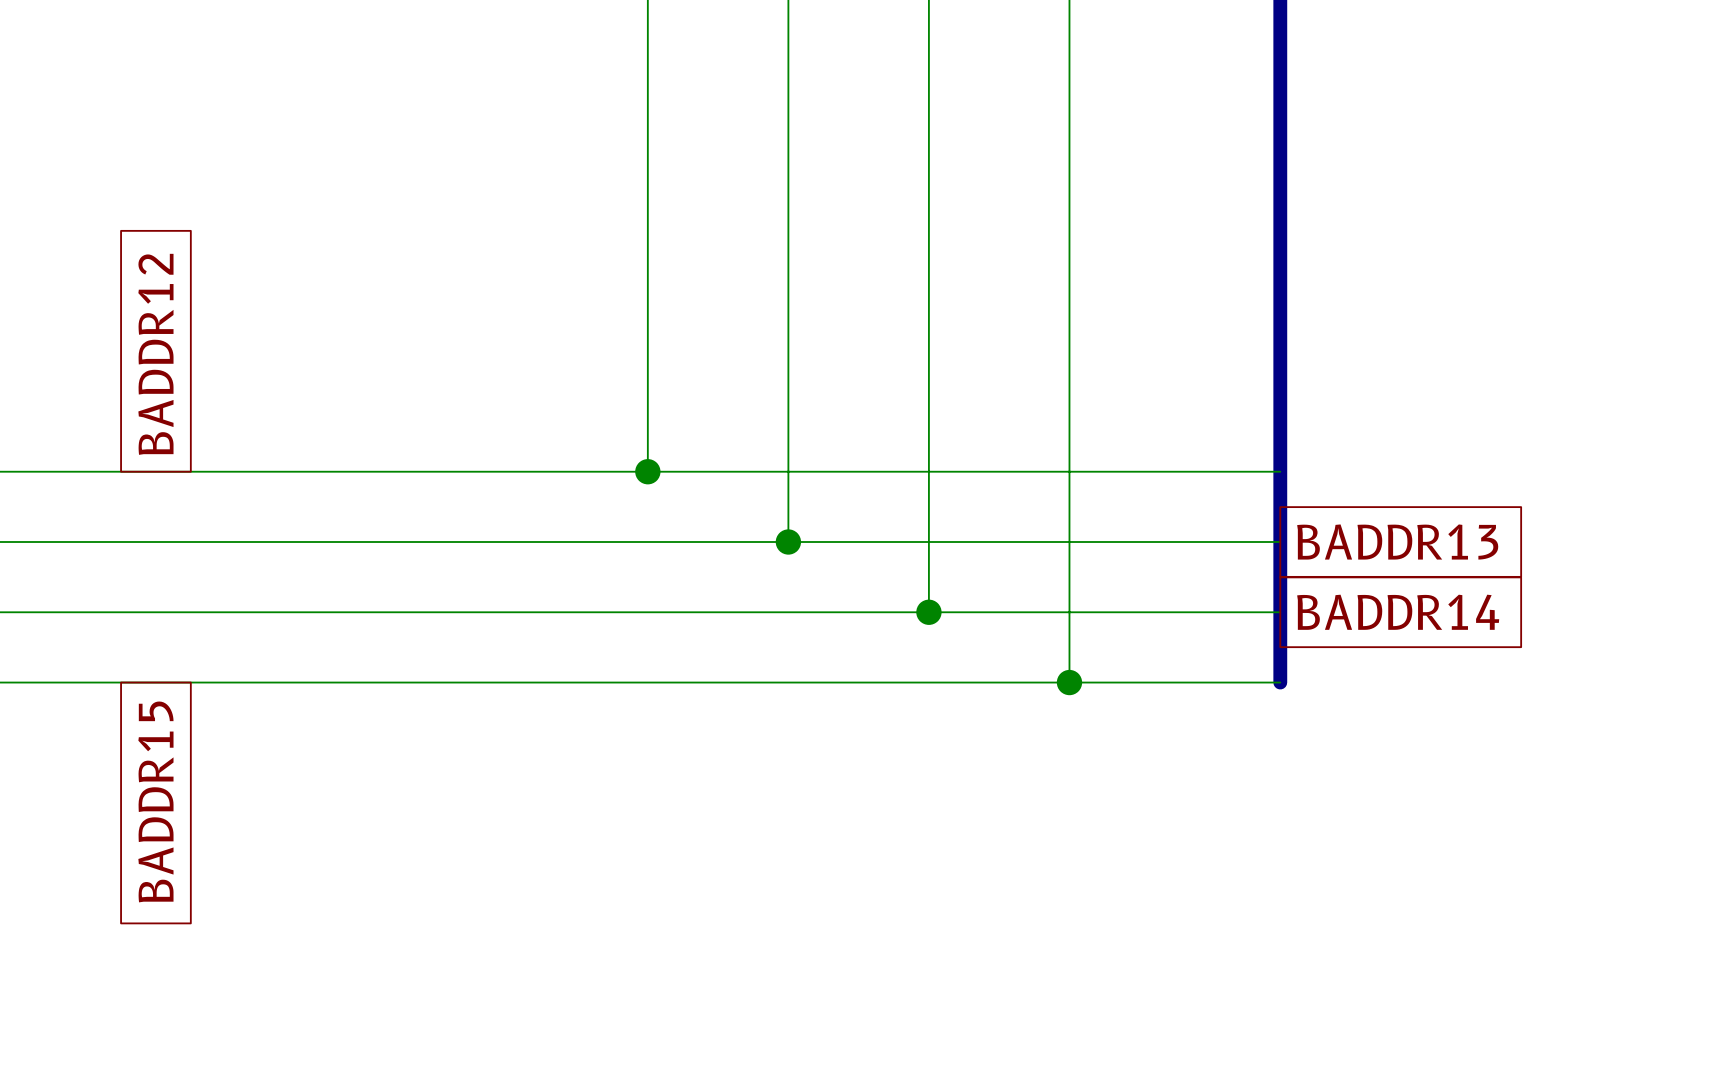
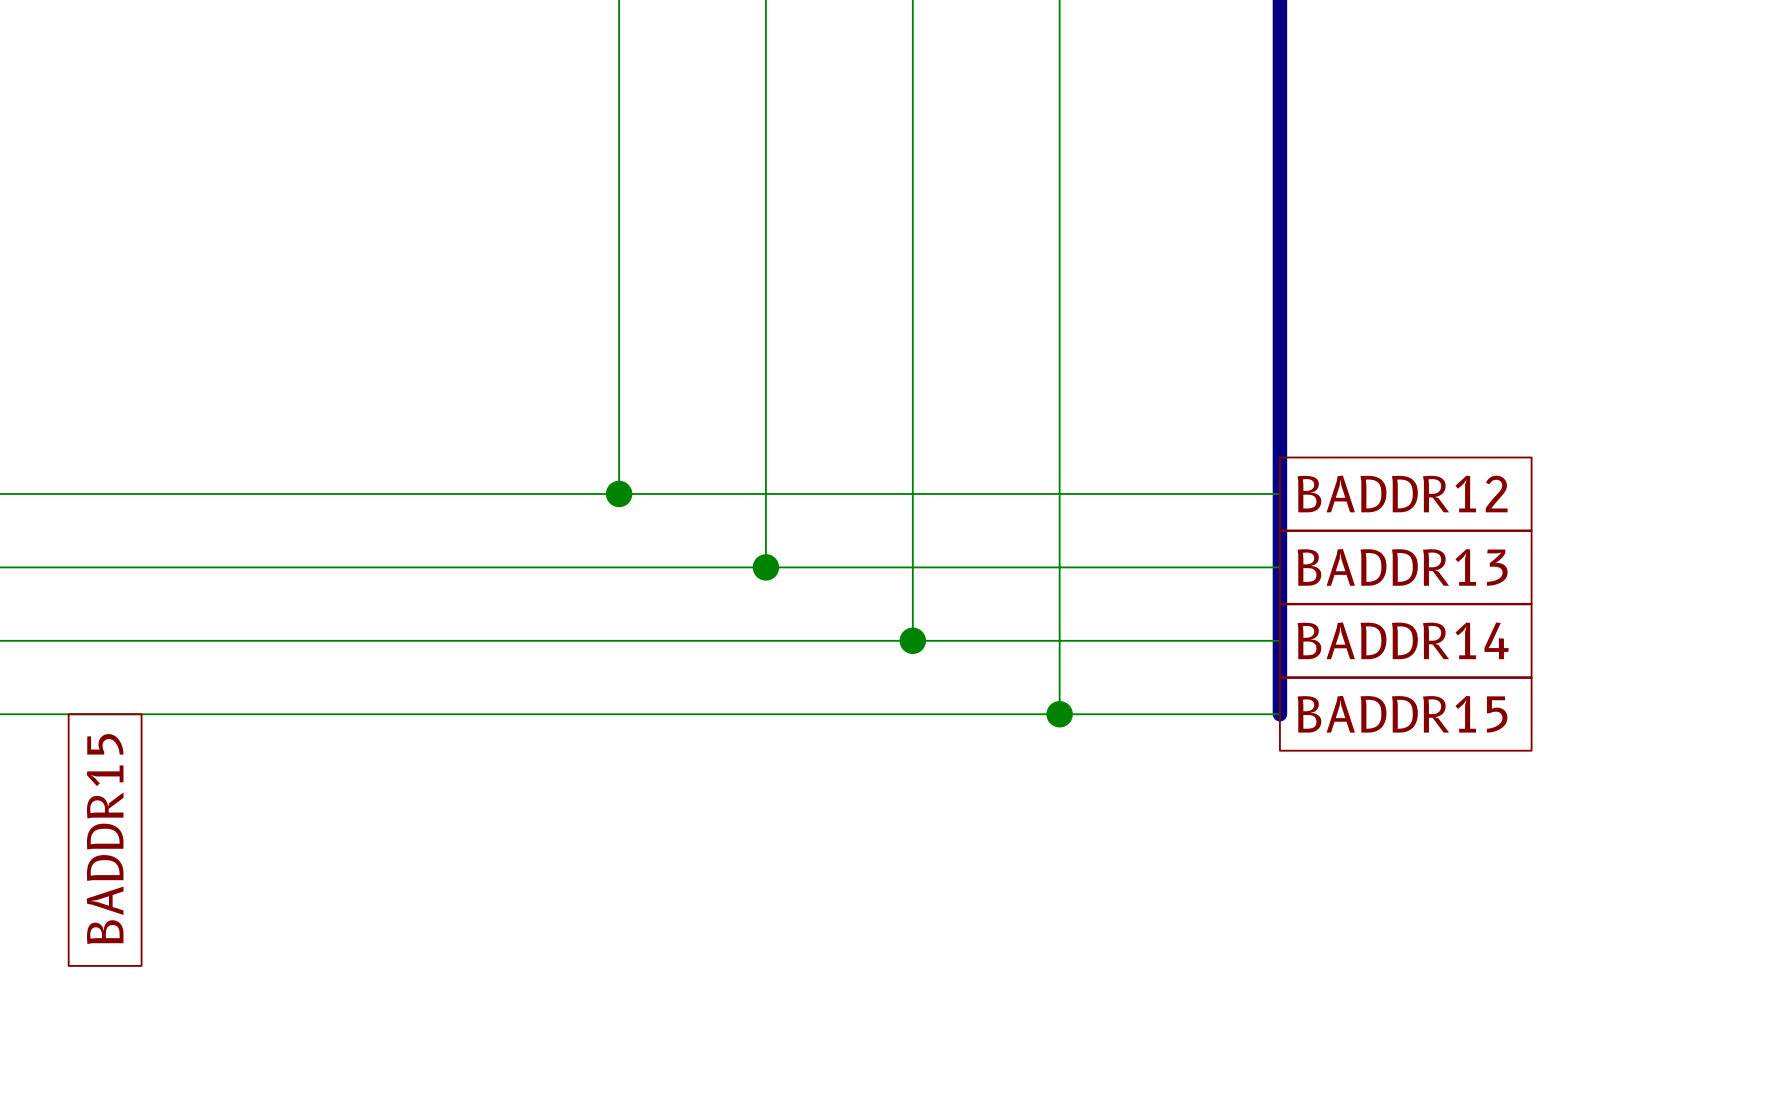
global label: BADDR12 (155, 354) -> none
global label: none -> BADDR12 (1402, 493)
global label: none -> BADDR15 (1402, 714)

